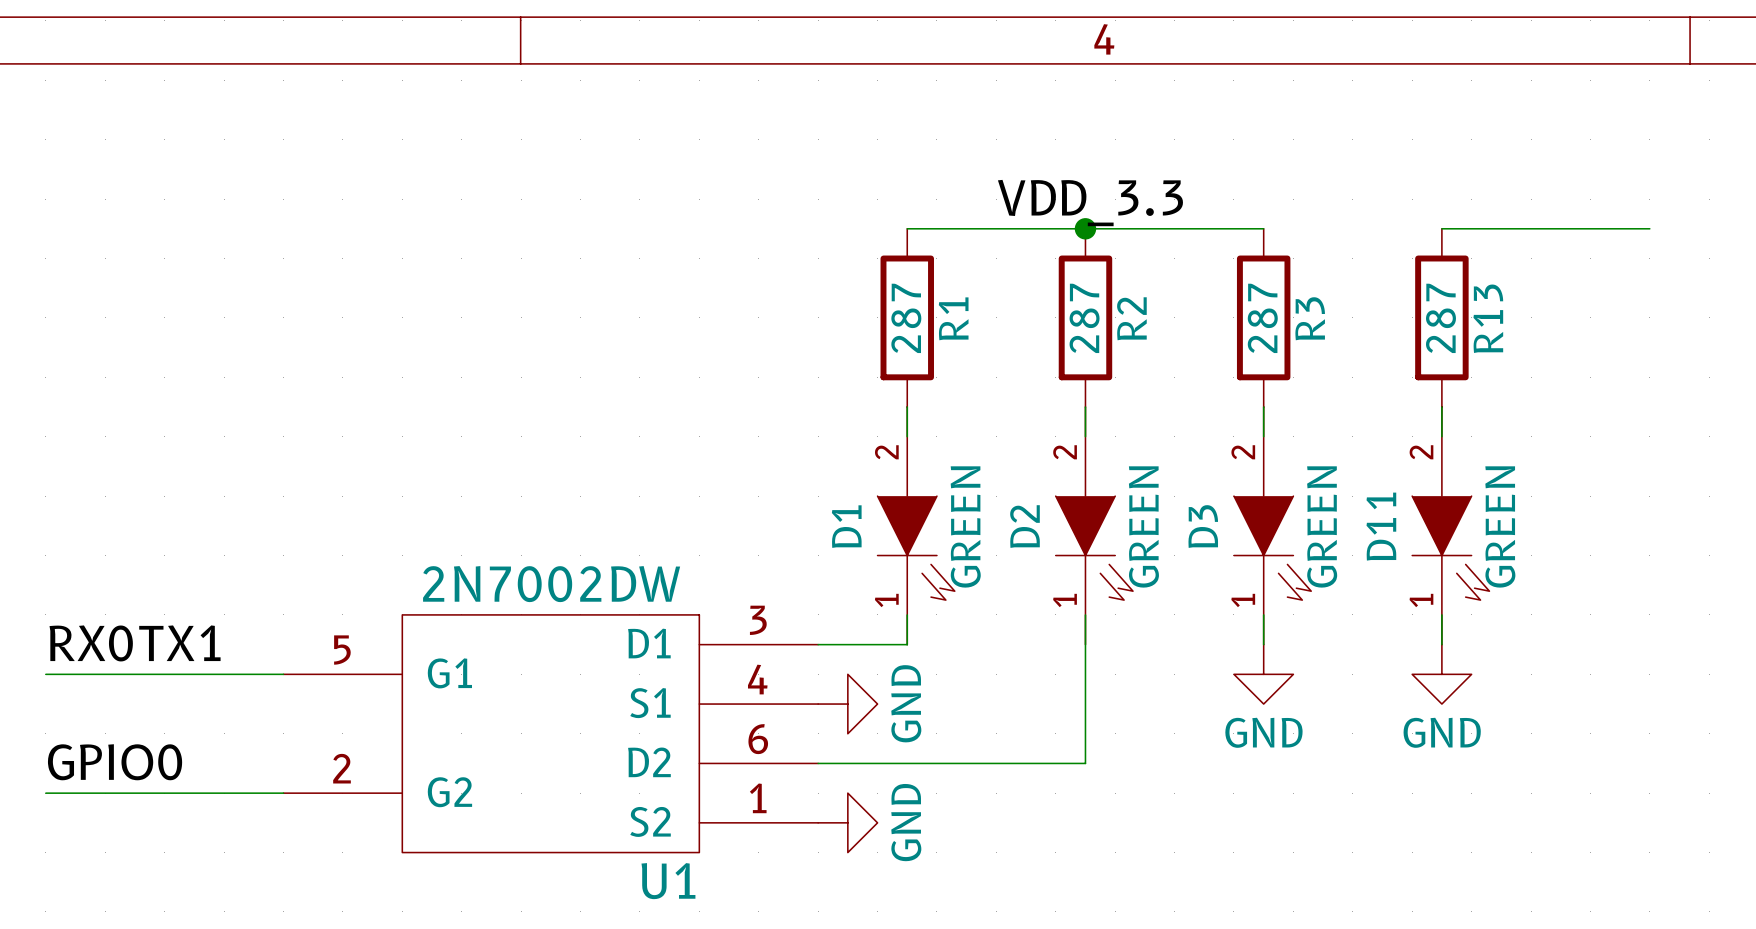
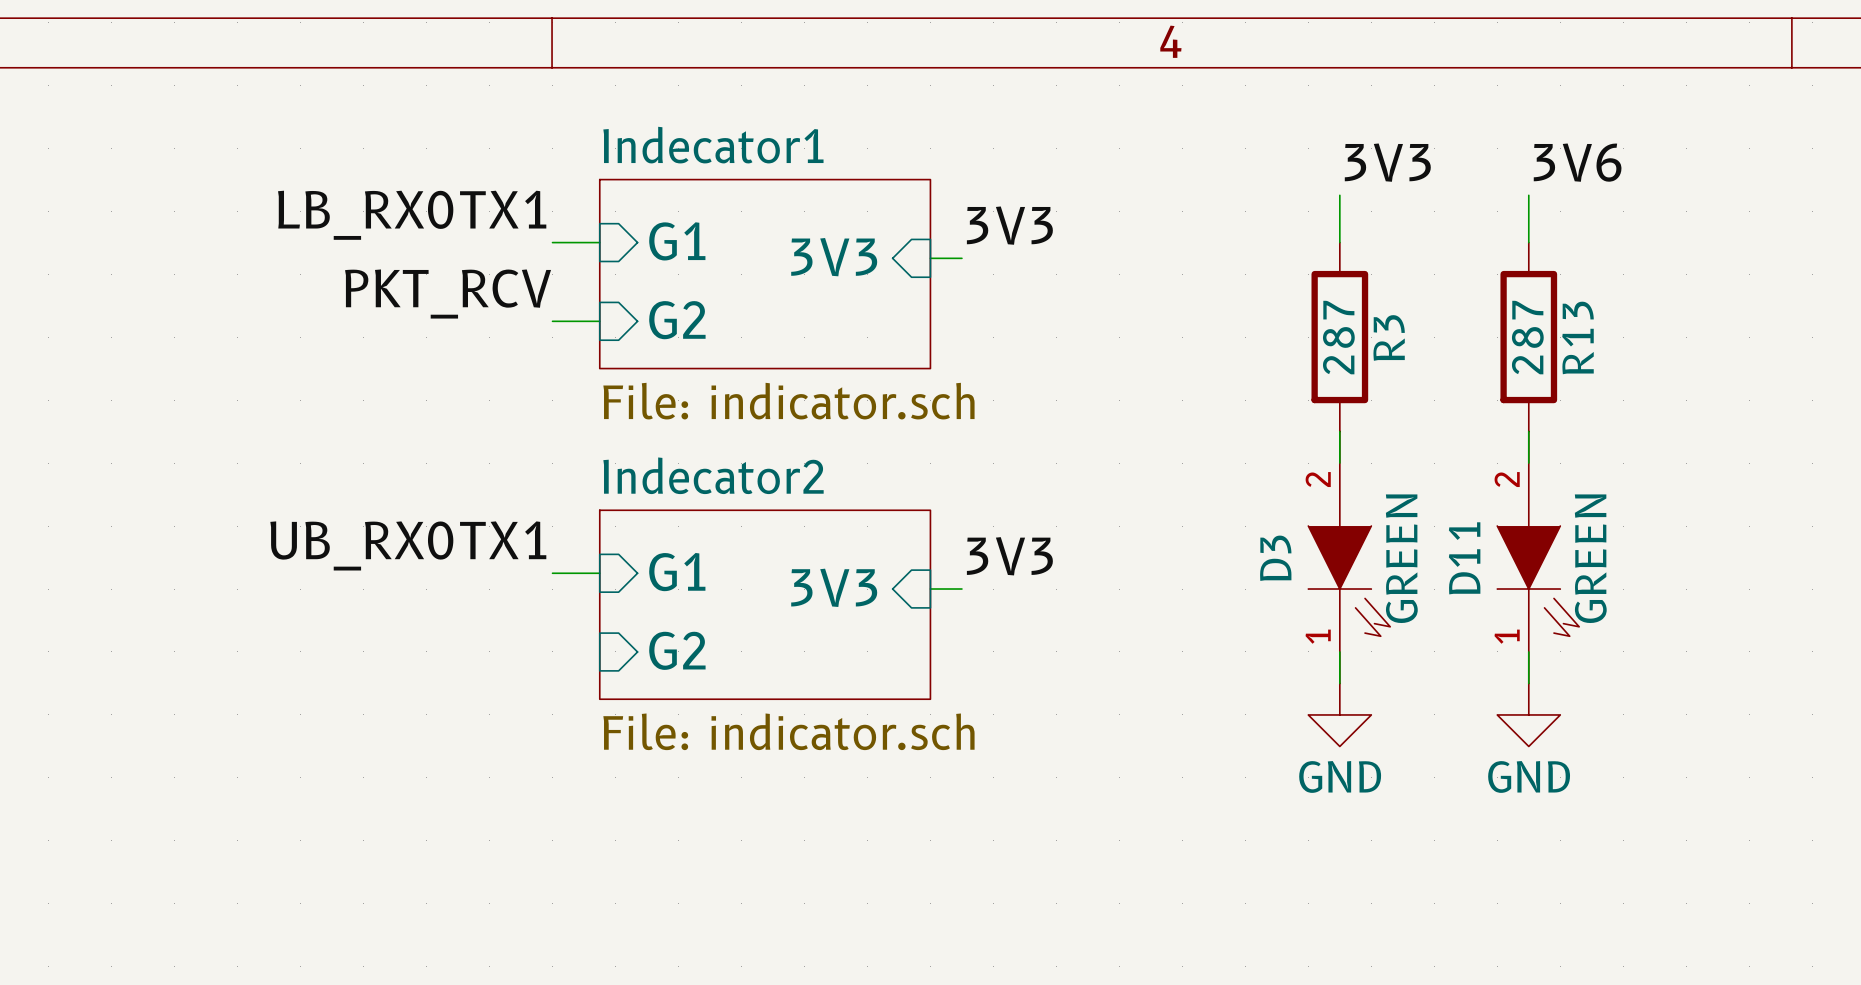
label: none -> 3V3 (1387, 162)
label: none -> 3V6 (1577, 162)
label: none -> LB_RX0TX1 (412, 215)
label: VDD_3.3 (1090, 203) -> none
label: none -> 3V3 (1009, 225)
sheet pin: none -> G1 (677, 241)
wire: none -> (552, 242) (599, 242)
wire: (907, 228) (1263, 228) -> (1339, 195) (1339, 242)
junction: (1085, 228) -> none
wire: (1441, 228) (1649, 228) -> (1528, 242) (1528, 195)
sheet pin: none -> 3V3 (834, 257)
wire: none -> (930, 258) (961, 258)
sheet Indecator1: none -> File: indicator.sch (765, 274)
label: none -> PKT_RCV (448, 294)
sheet pin: none -> G2 (677, 320)
wire: none -> (552, 321) (599, 321)
R1: 287 (907, 317) -> none
R2: 287 (1085, 317) -> none
wire: (907, 407) (907, 436) -> none
wire: (1085, 407) (1085, 436) -> none
label: none -> UB_RX0TX1 (408, 545)
label: none -> 3V3 (1009, 556)
D1: GREEN (916, 525) -> none
D2: GREEN (1094, 525) -> none
sheet pin: none -> G1 (677, 572)
wire: none -> (552, 573) (599, 573)
sheet pin: none -> 3V3 (834, 587)
sheet Indecator2: none -> File: indicator.sch (765, 604)
sheet pin: none -> G2 (677, 650)
wire: (907, 614) (907, 644) (818, 644) -> none
wire: (1085, 614) (1085, 763) (818, 763) -> none
label: RX0TX1 (135, 643) -> none
wire: (45, 674) (283, 674) -> none
power symbol: GND (847, 704) -> none
U1: 2N7002DW (550, 733) -> none
label: GPIO0 (115, 762) -> none
wire: (45, 793) (283, 793) -> none
power symbol: GND (847, 822) -> none

